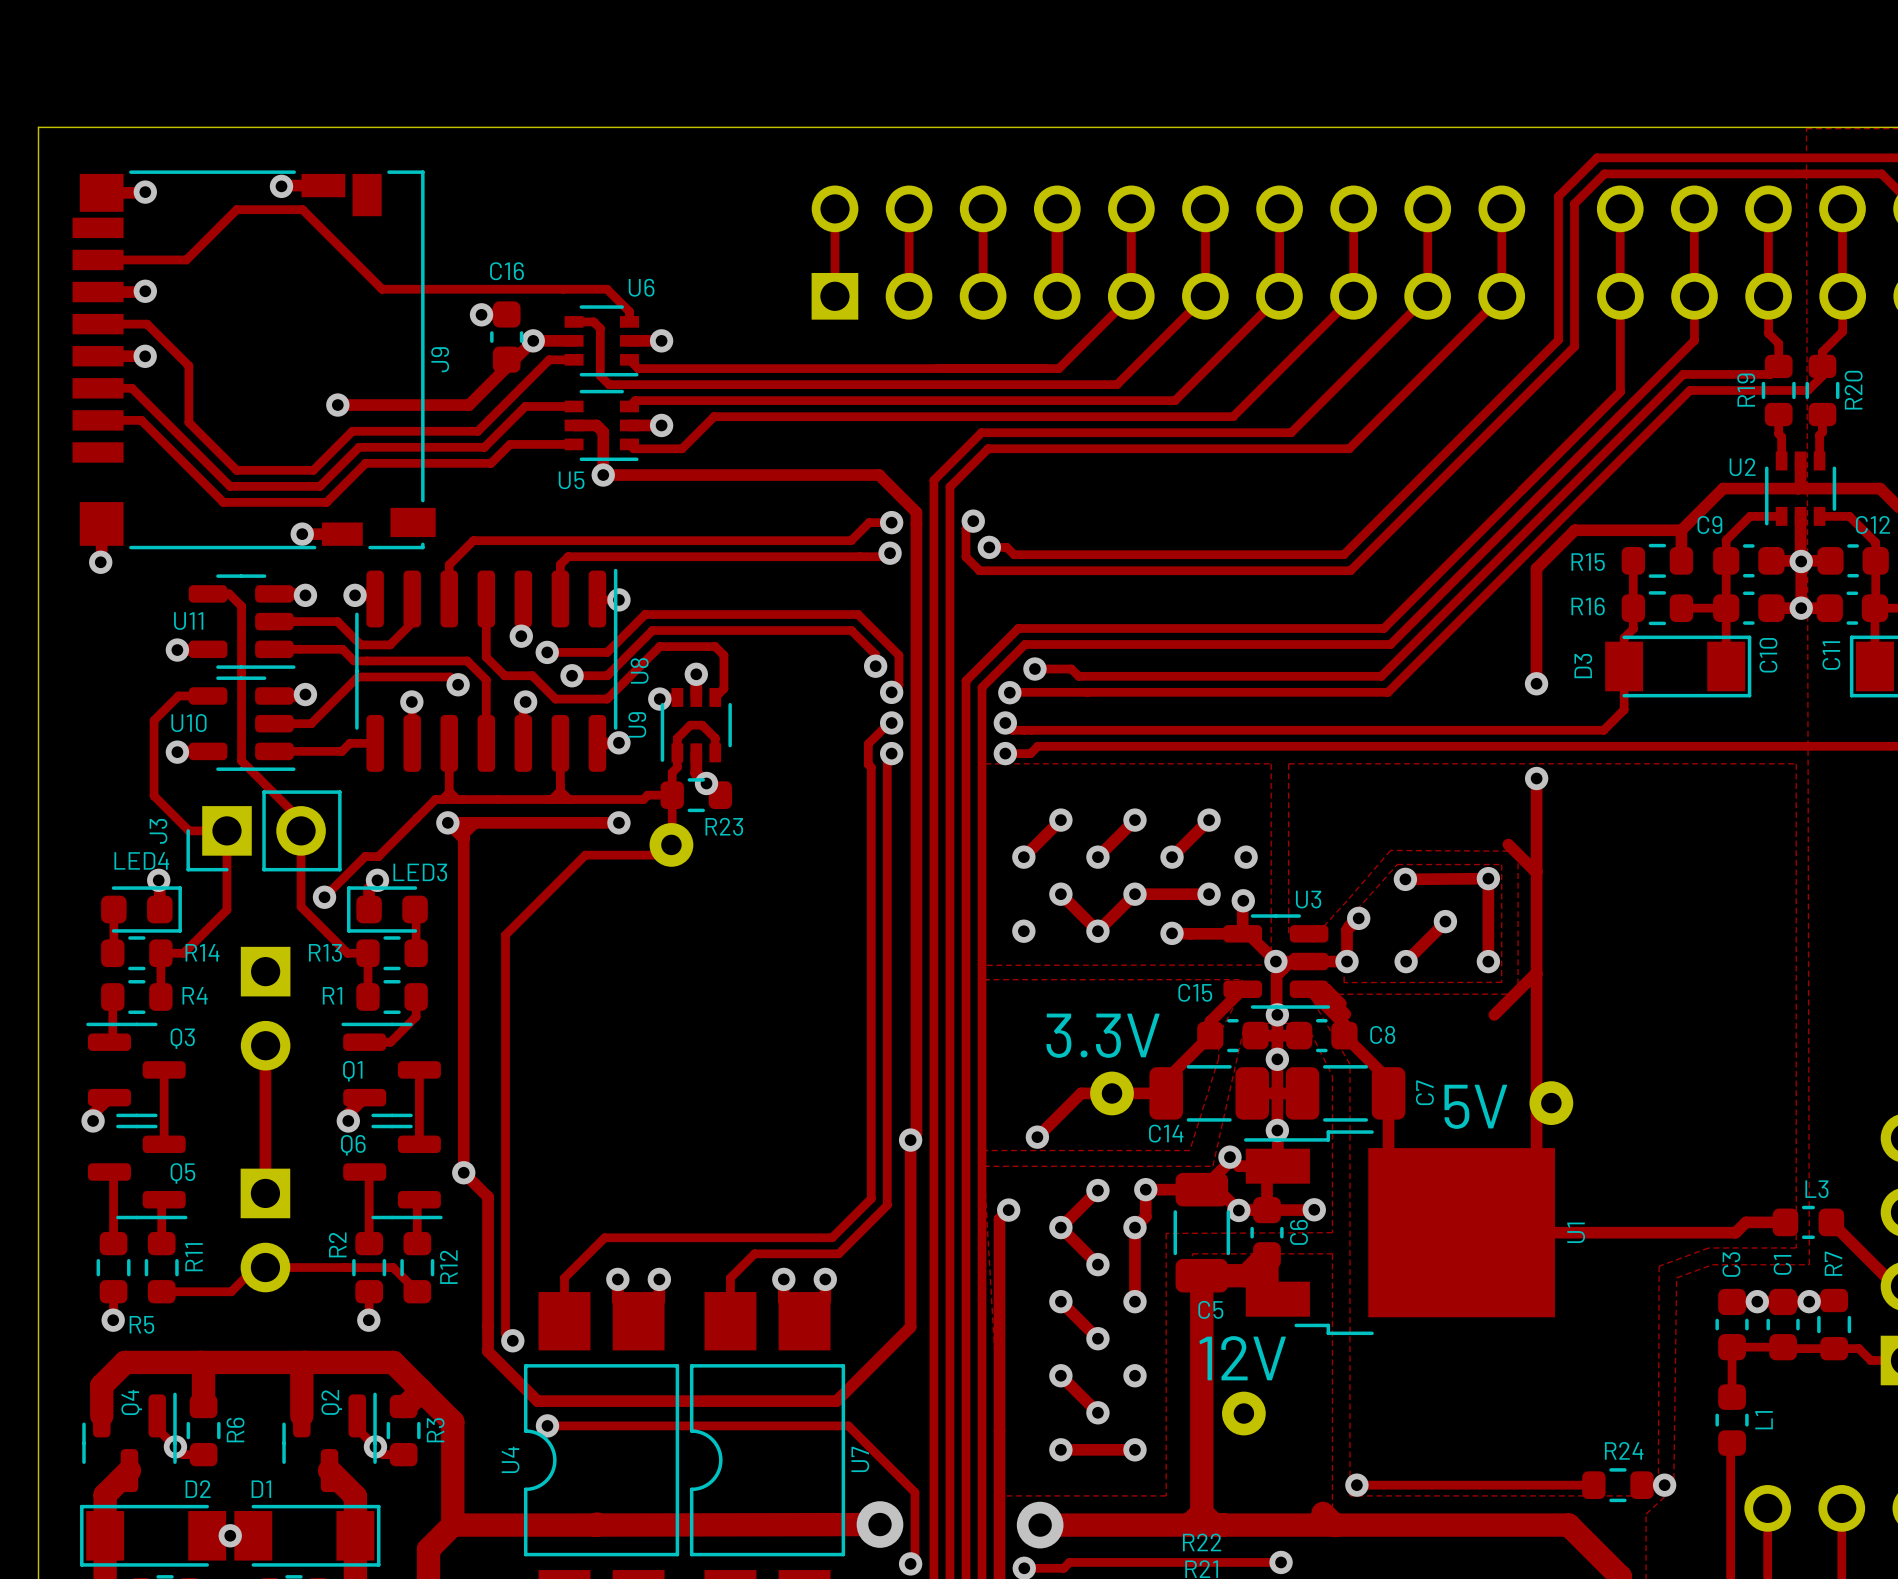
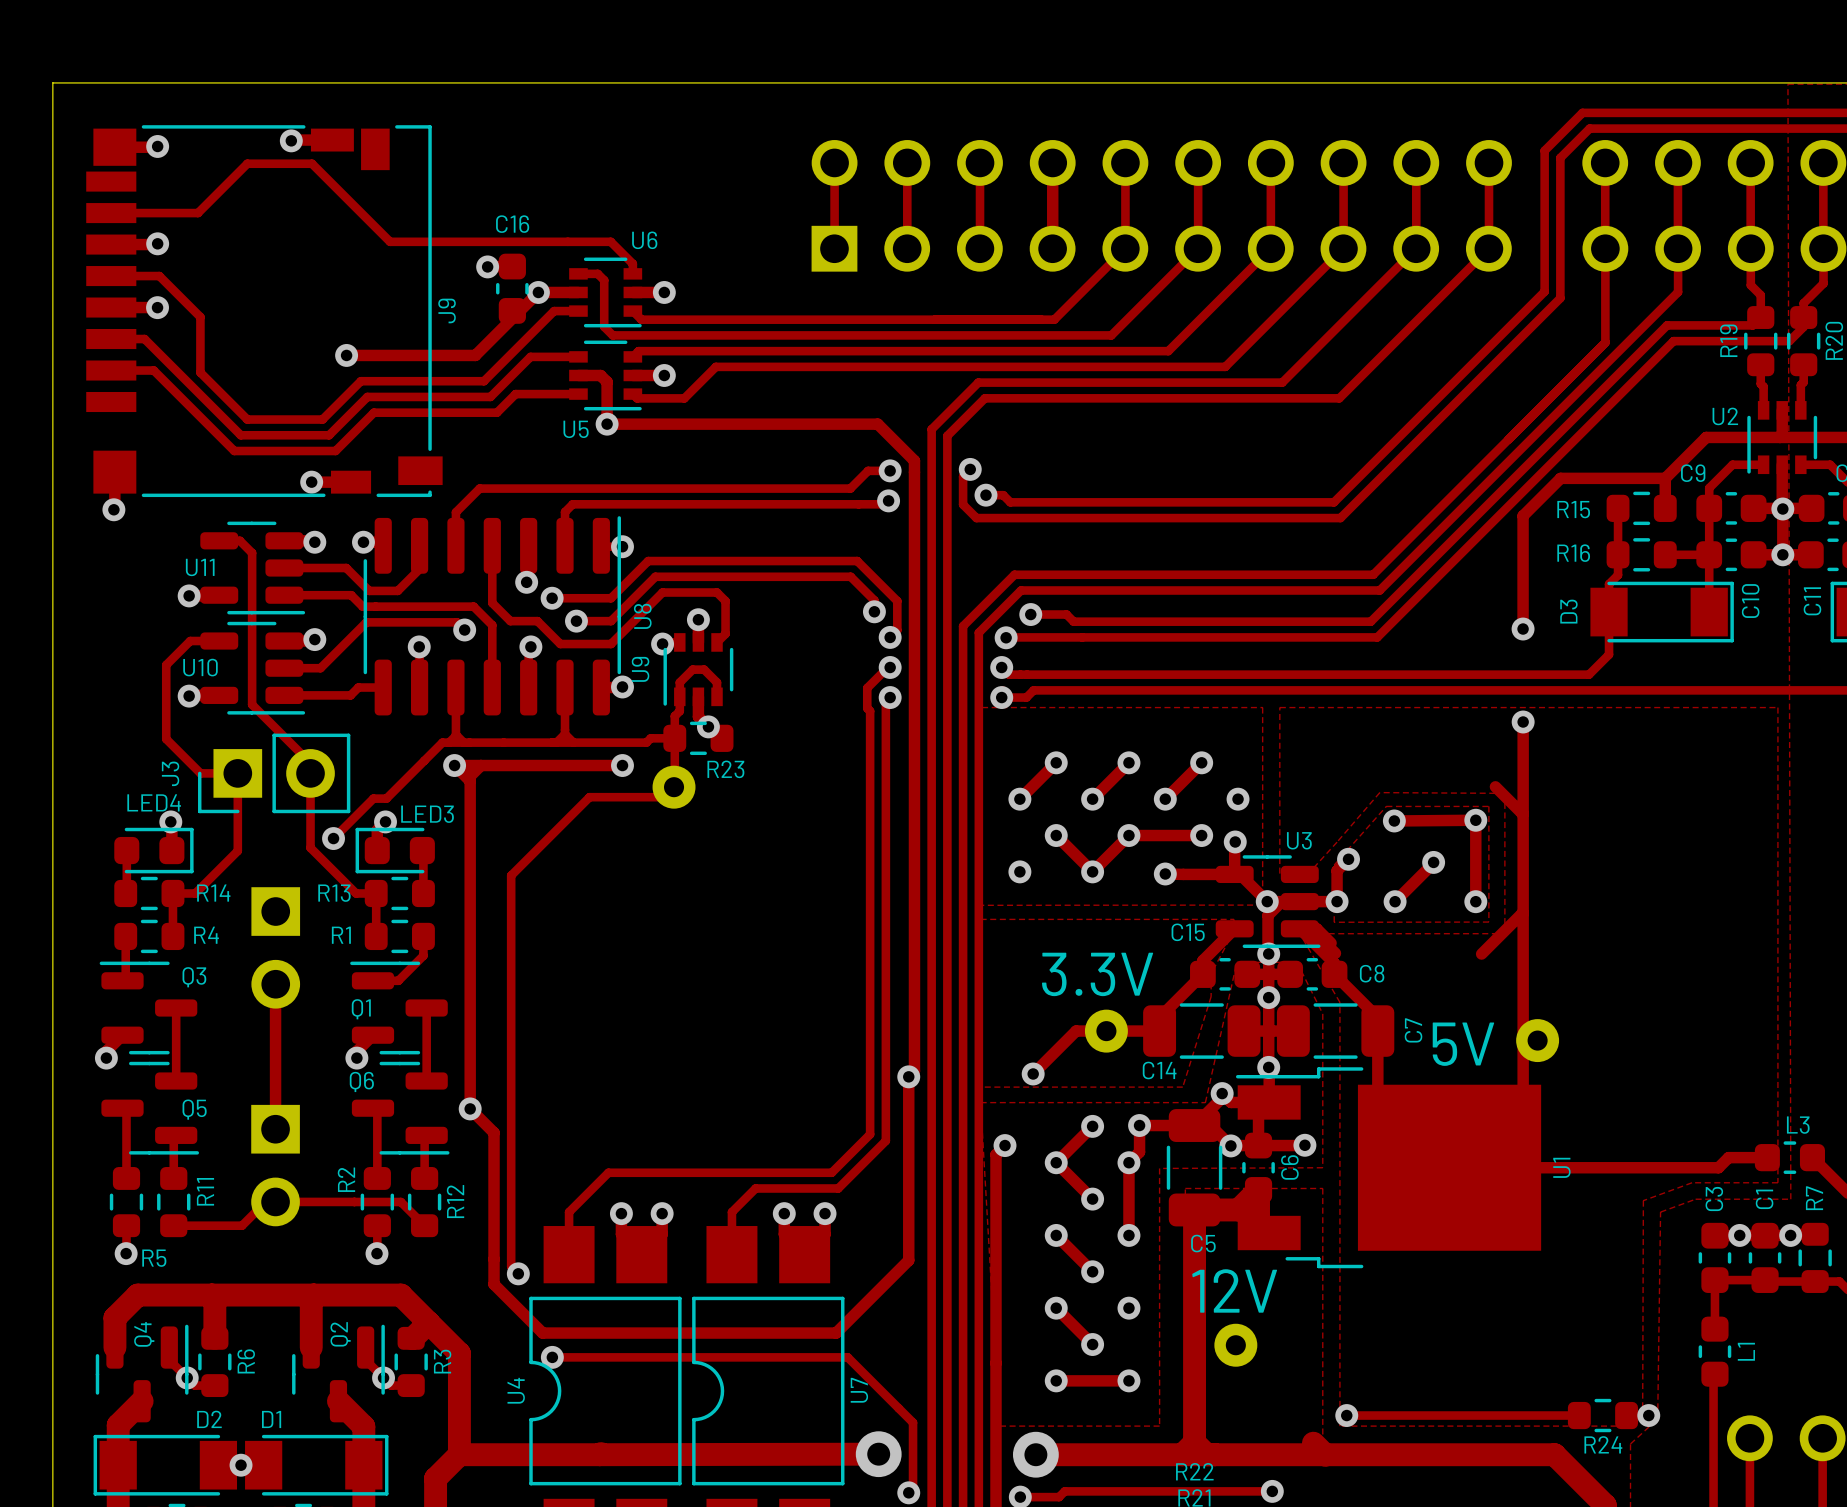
R24 name position: R24 (1624, 1450) -> R24 (1603, 1444)

